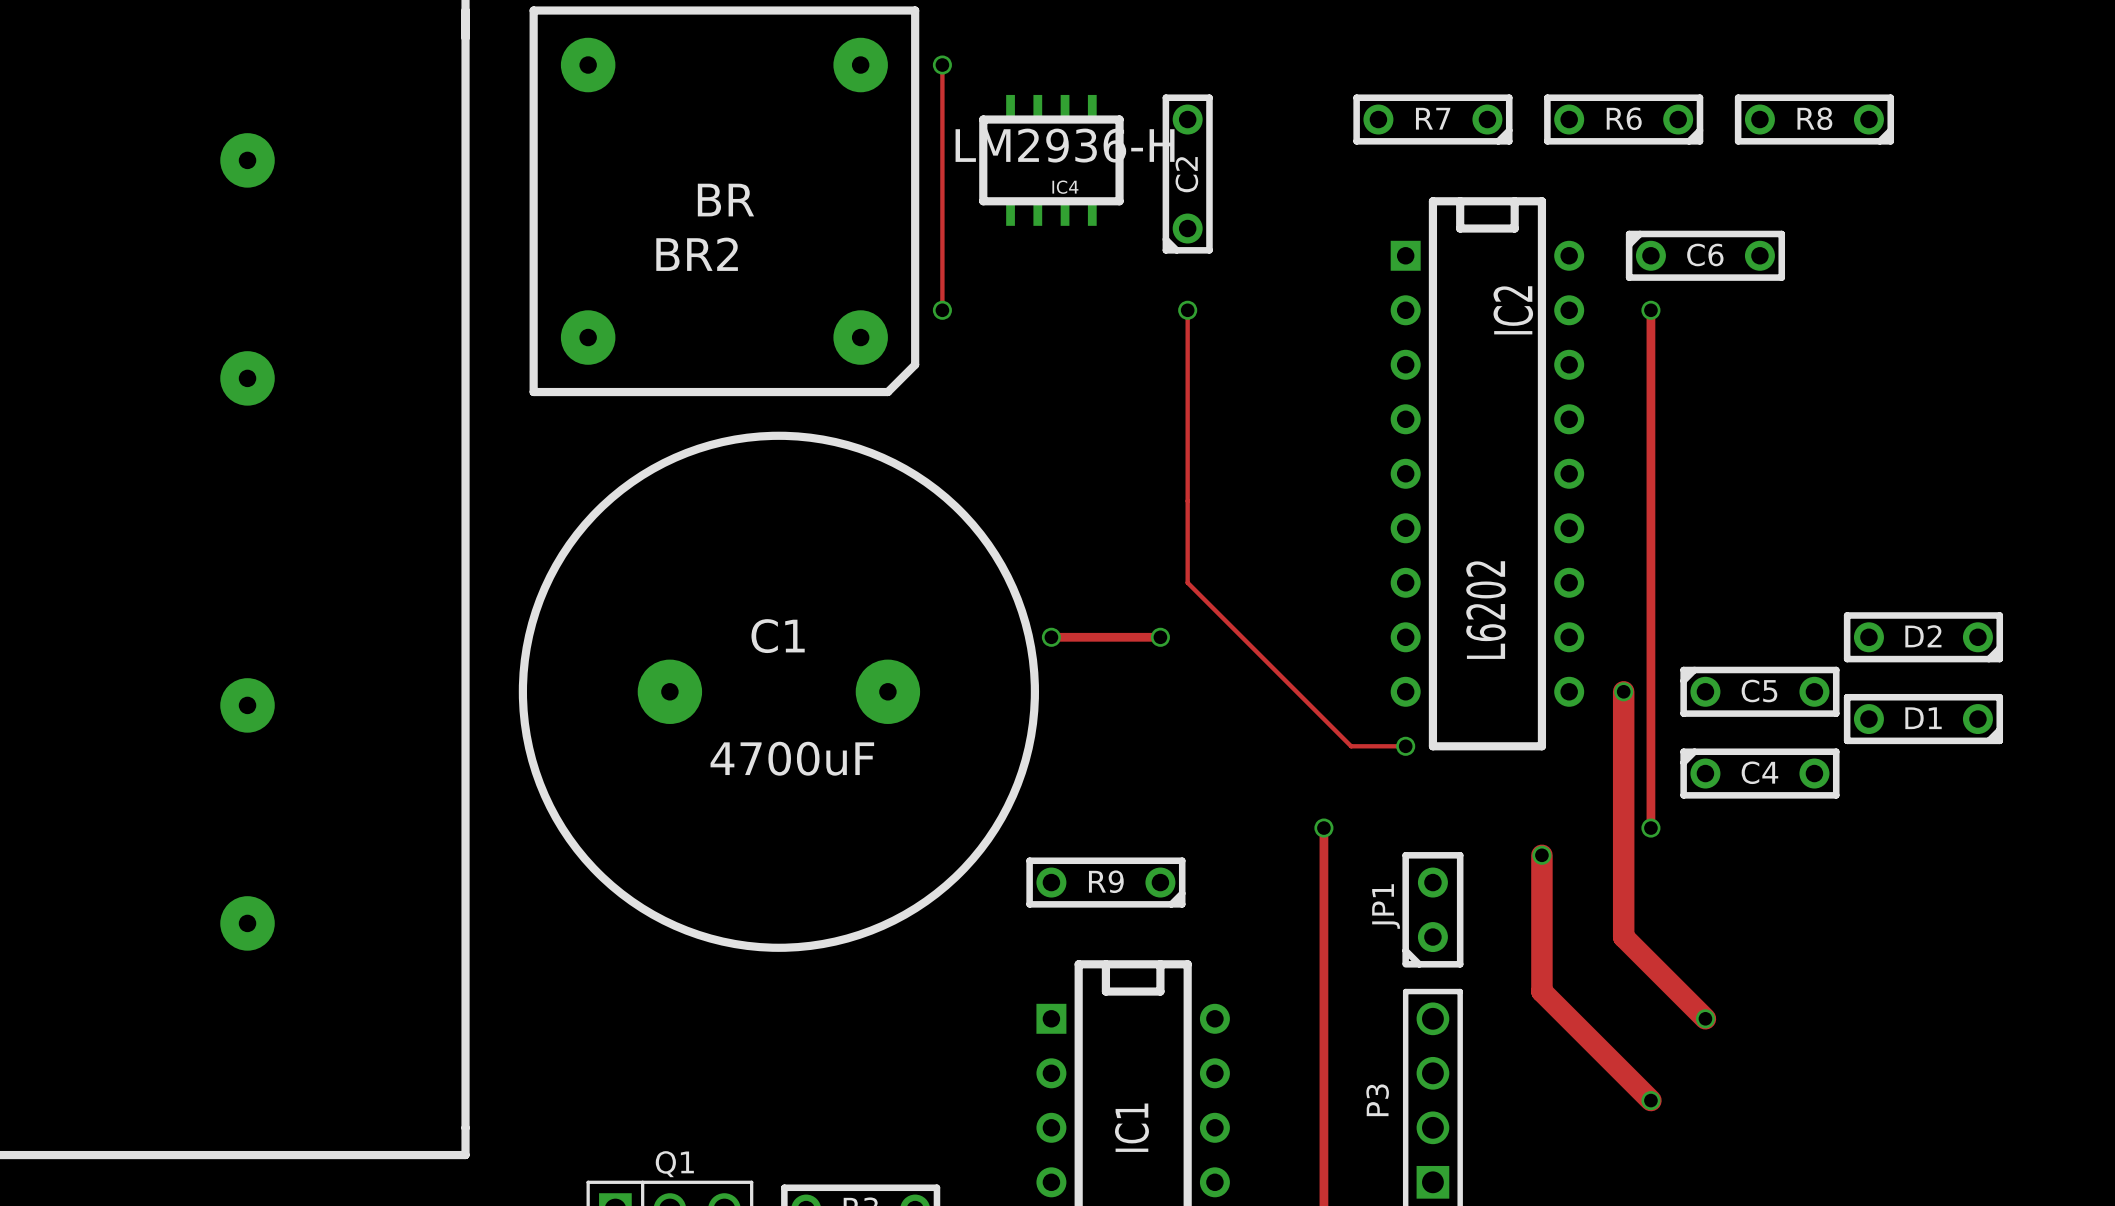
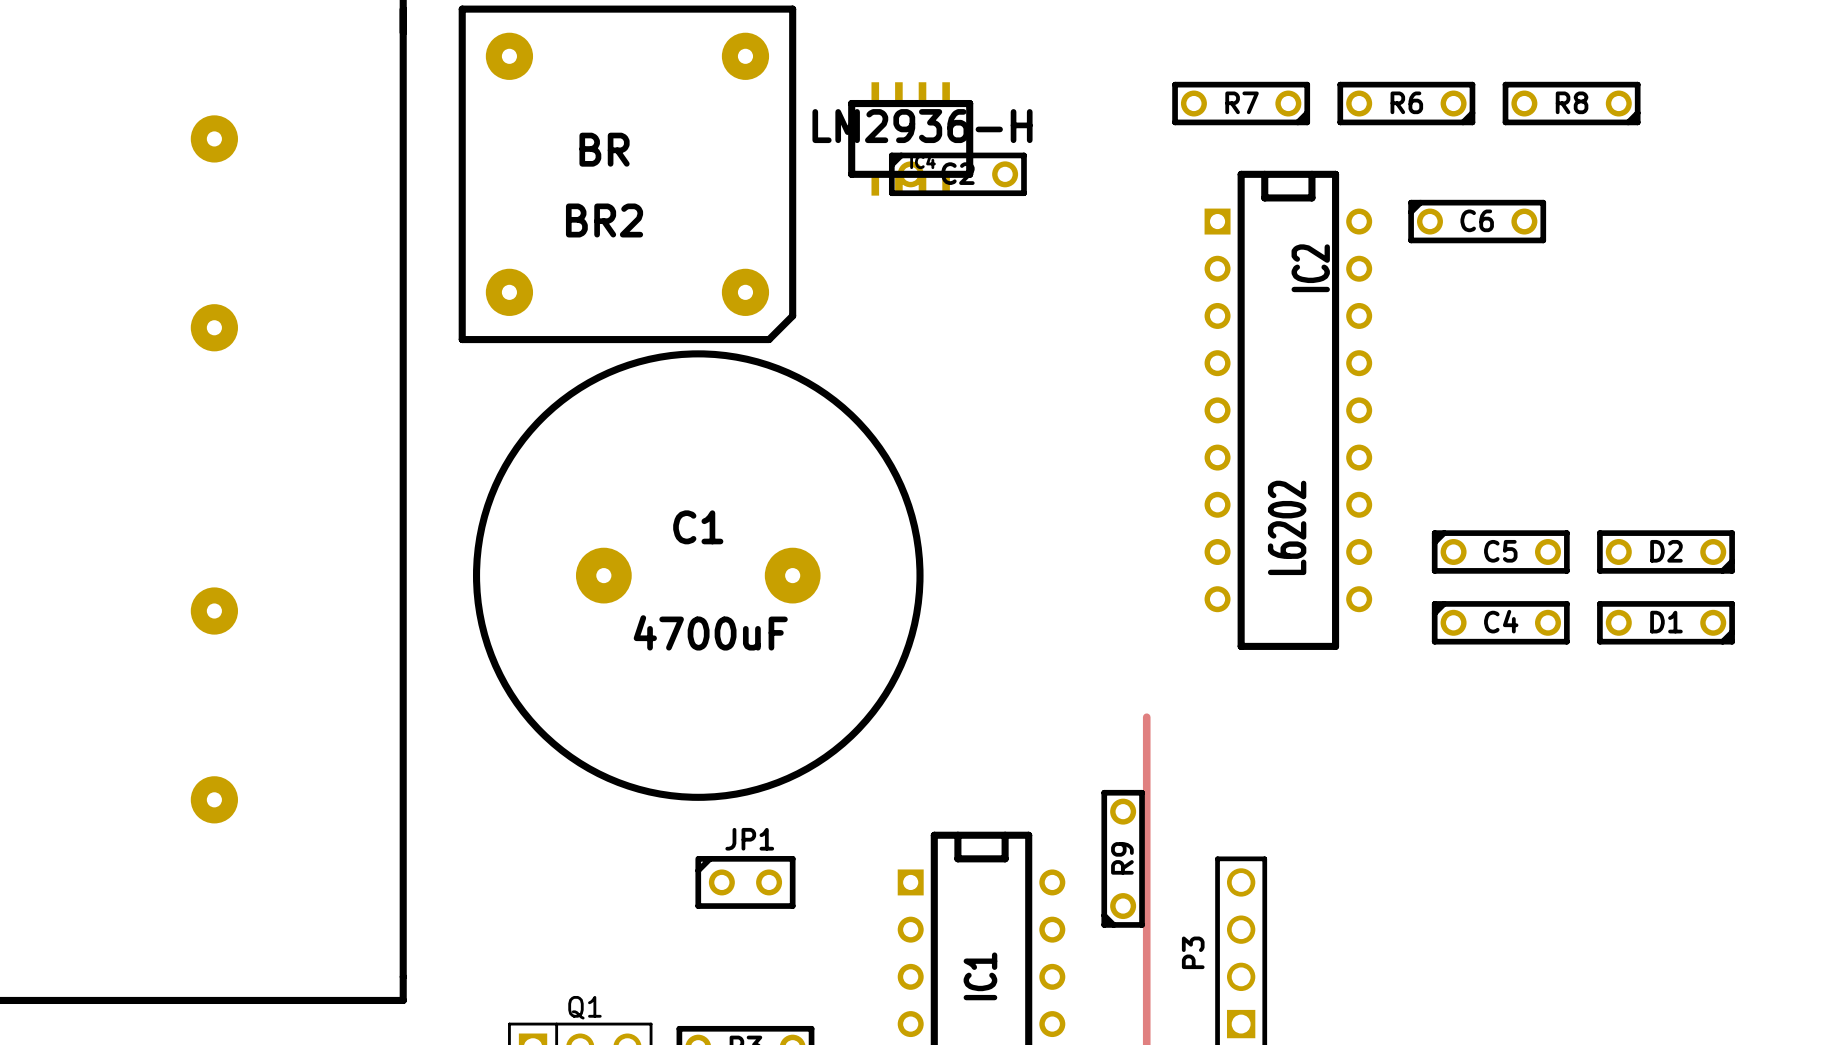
track: (942, 65) (942, 310) -> none
via: (942, 65) -> none
C2 rotation: 0° (1187, 174) -> 90° clockwise (957, 174)
BR2 value position: BR (725, 200) -> BR (604, 149)
via: (942, 310) -> none
track: (1187, 310) (1187, 582) (1351, 746) (1405, 746) -> none
via: (1187, 310) -> none
track: (1650, 310) (1650, 828) -> none
via: (1650, 310) -> none
track: (1051, 637) (1160, 637) -> none
via: (1051, 637) -> none
via: (1160, 637) -> none
C1 position: (778, 691) -> (698, 575)
track: (1623, 691) (1623, 937) (1705, 1018) -> none
via: (1623, 691) -> none
C5 position: (1759, 691) -> (1500, 551)
via: (1405, 746) -> none
C4 position: (1759, 773) -> (1500, 622)
via: (1323, 828) -> none
via: (1650, 828) -> none
track: (1541, 855) (1541, 991) (1650, 1100) -> none
via: (1541, 855) -> none
R9 rotation: 0° (1105, 882) -> 90° clockwise (1123, 858)
R9 position: (1105, 882) -> (1123, 858)
JP1 rotation: 0° (1432, 909) -> 90° clockwise (745, 882)
JP1 position: (1432, 909) -> (745, 882)
via: (1705, 1018) -> none
via: (1650, 1100) -> none

